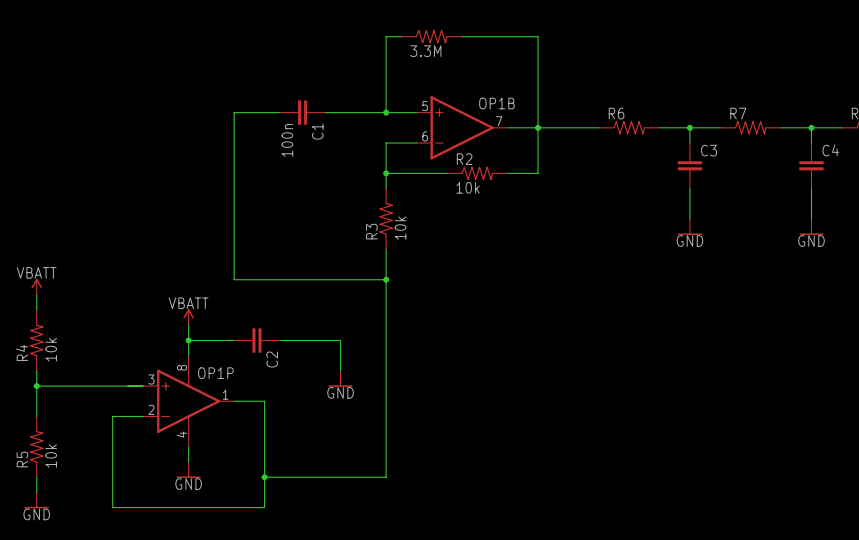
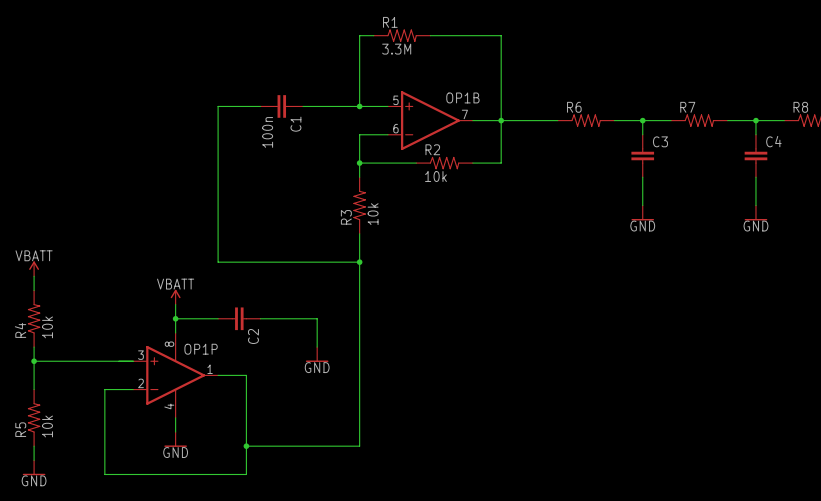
R1 name: none -> R1 (390, 22)

